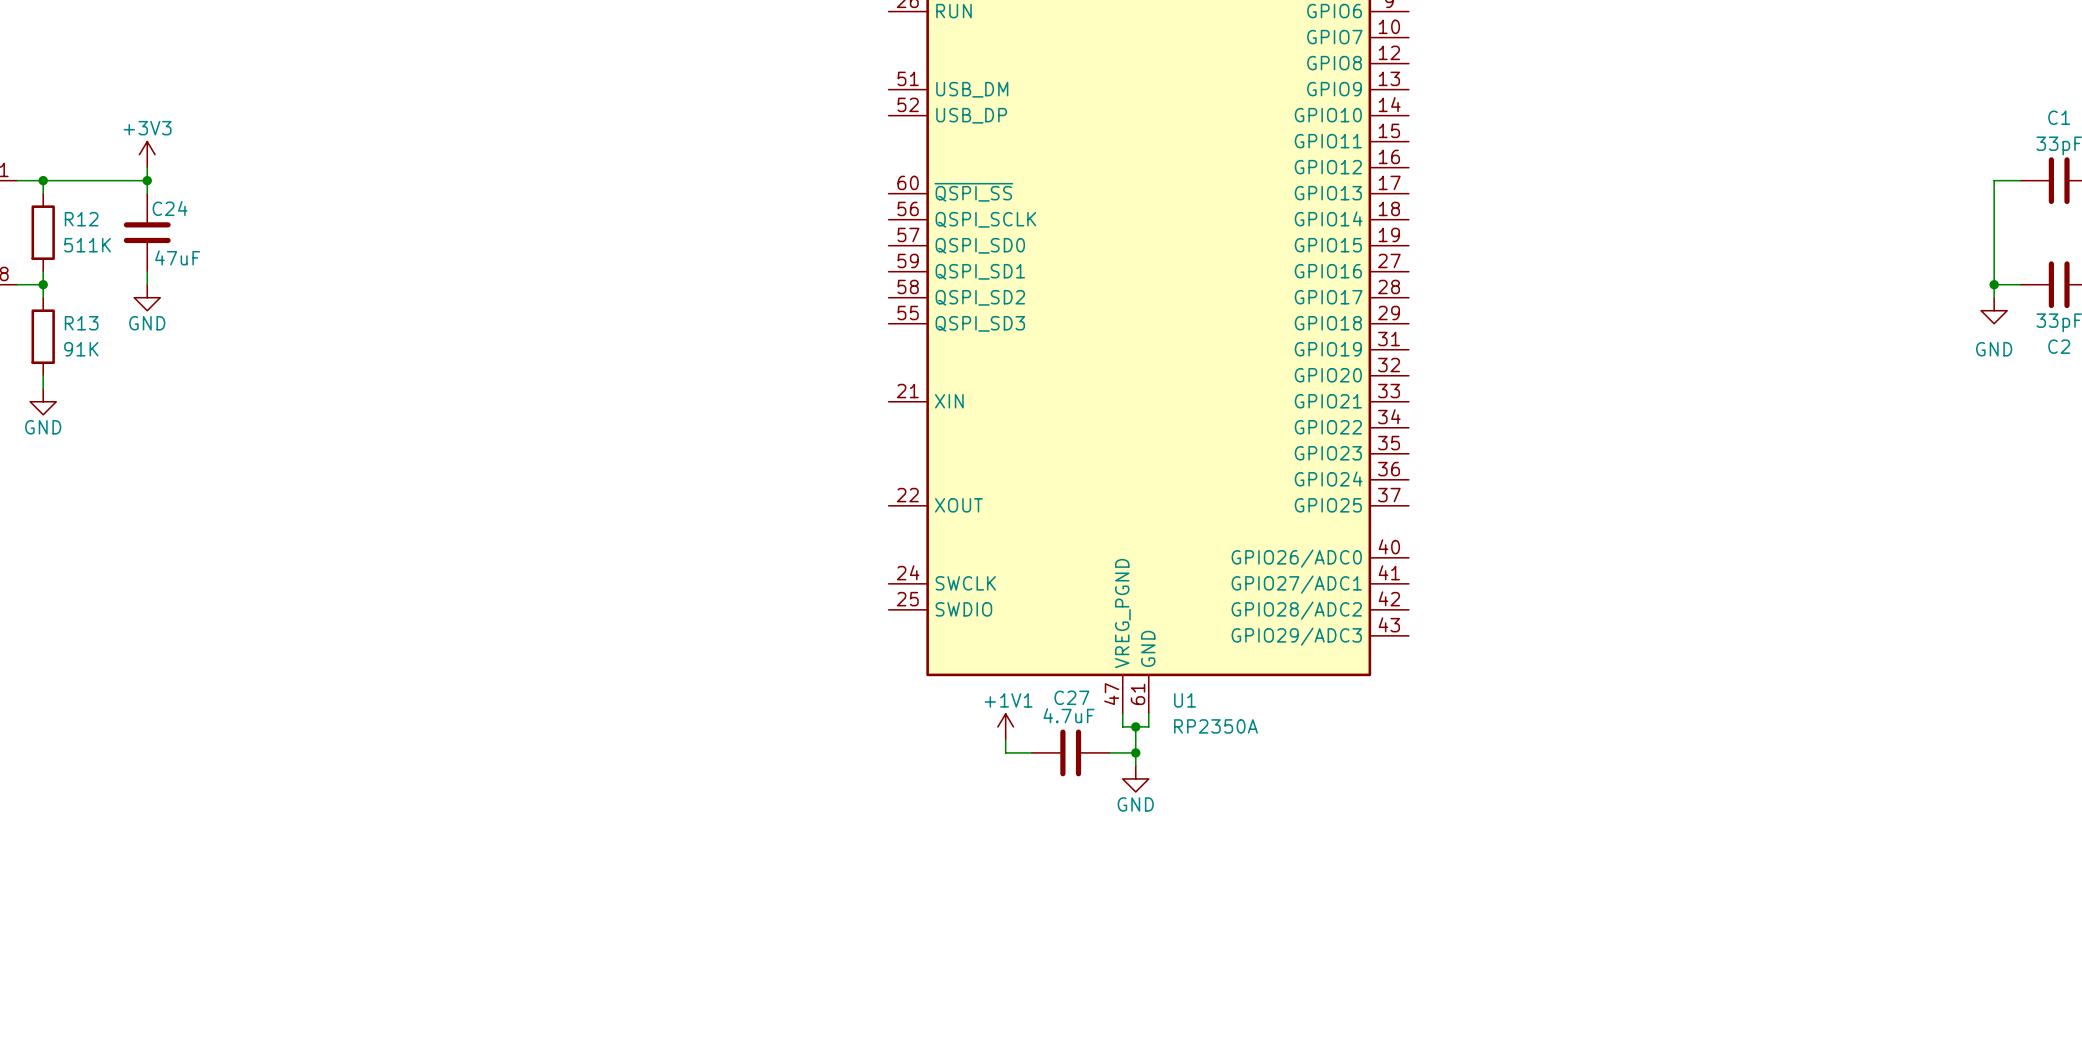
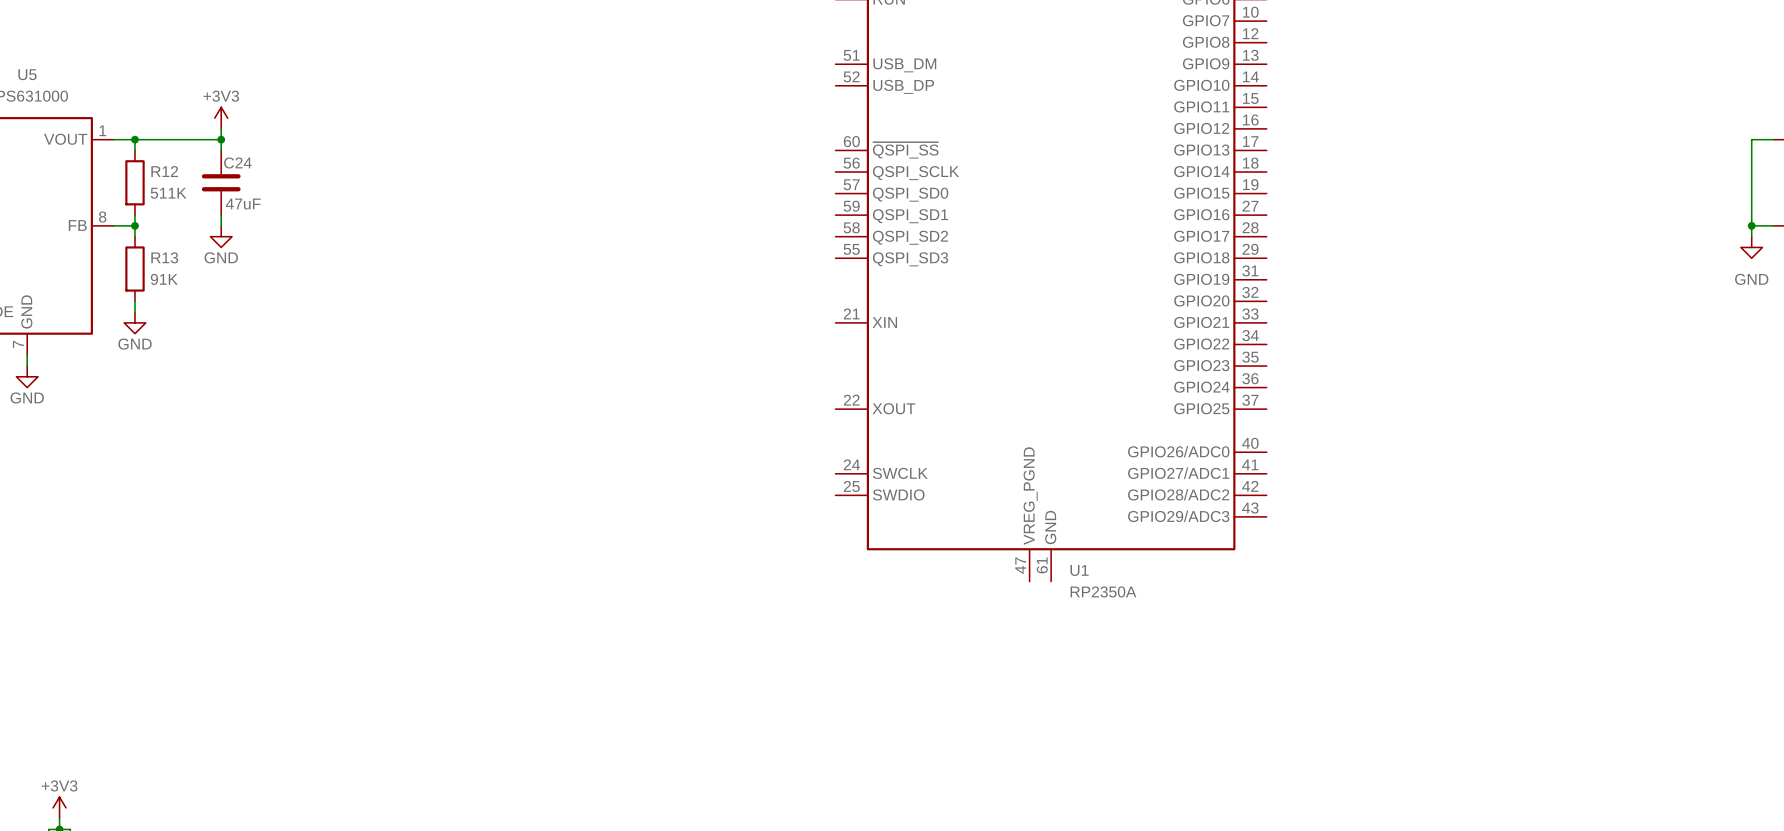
wire: (1122, 713) (1122, 726) (1148, 726) (1148, 713) -> none
power symbol: +1V1 (1005, 726) -> none
wire: (1135, 726) (1135, 765) -> none
junction: (1135, 726) -> none
wire: (1005, 739) (1005, 752) (1031, 752) -> none
C27: 4.7uF (1070, 752) -> none
wire: (1109, 752) (1135, 752) -> none
junction: (1135, 752) -> none
power symbol: GND (1135, 778) -> none

